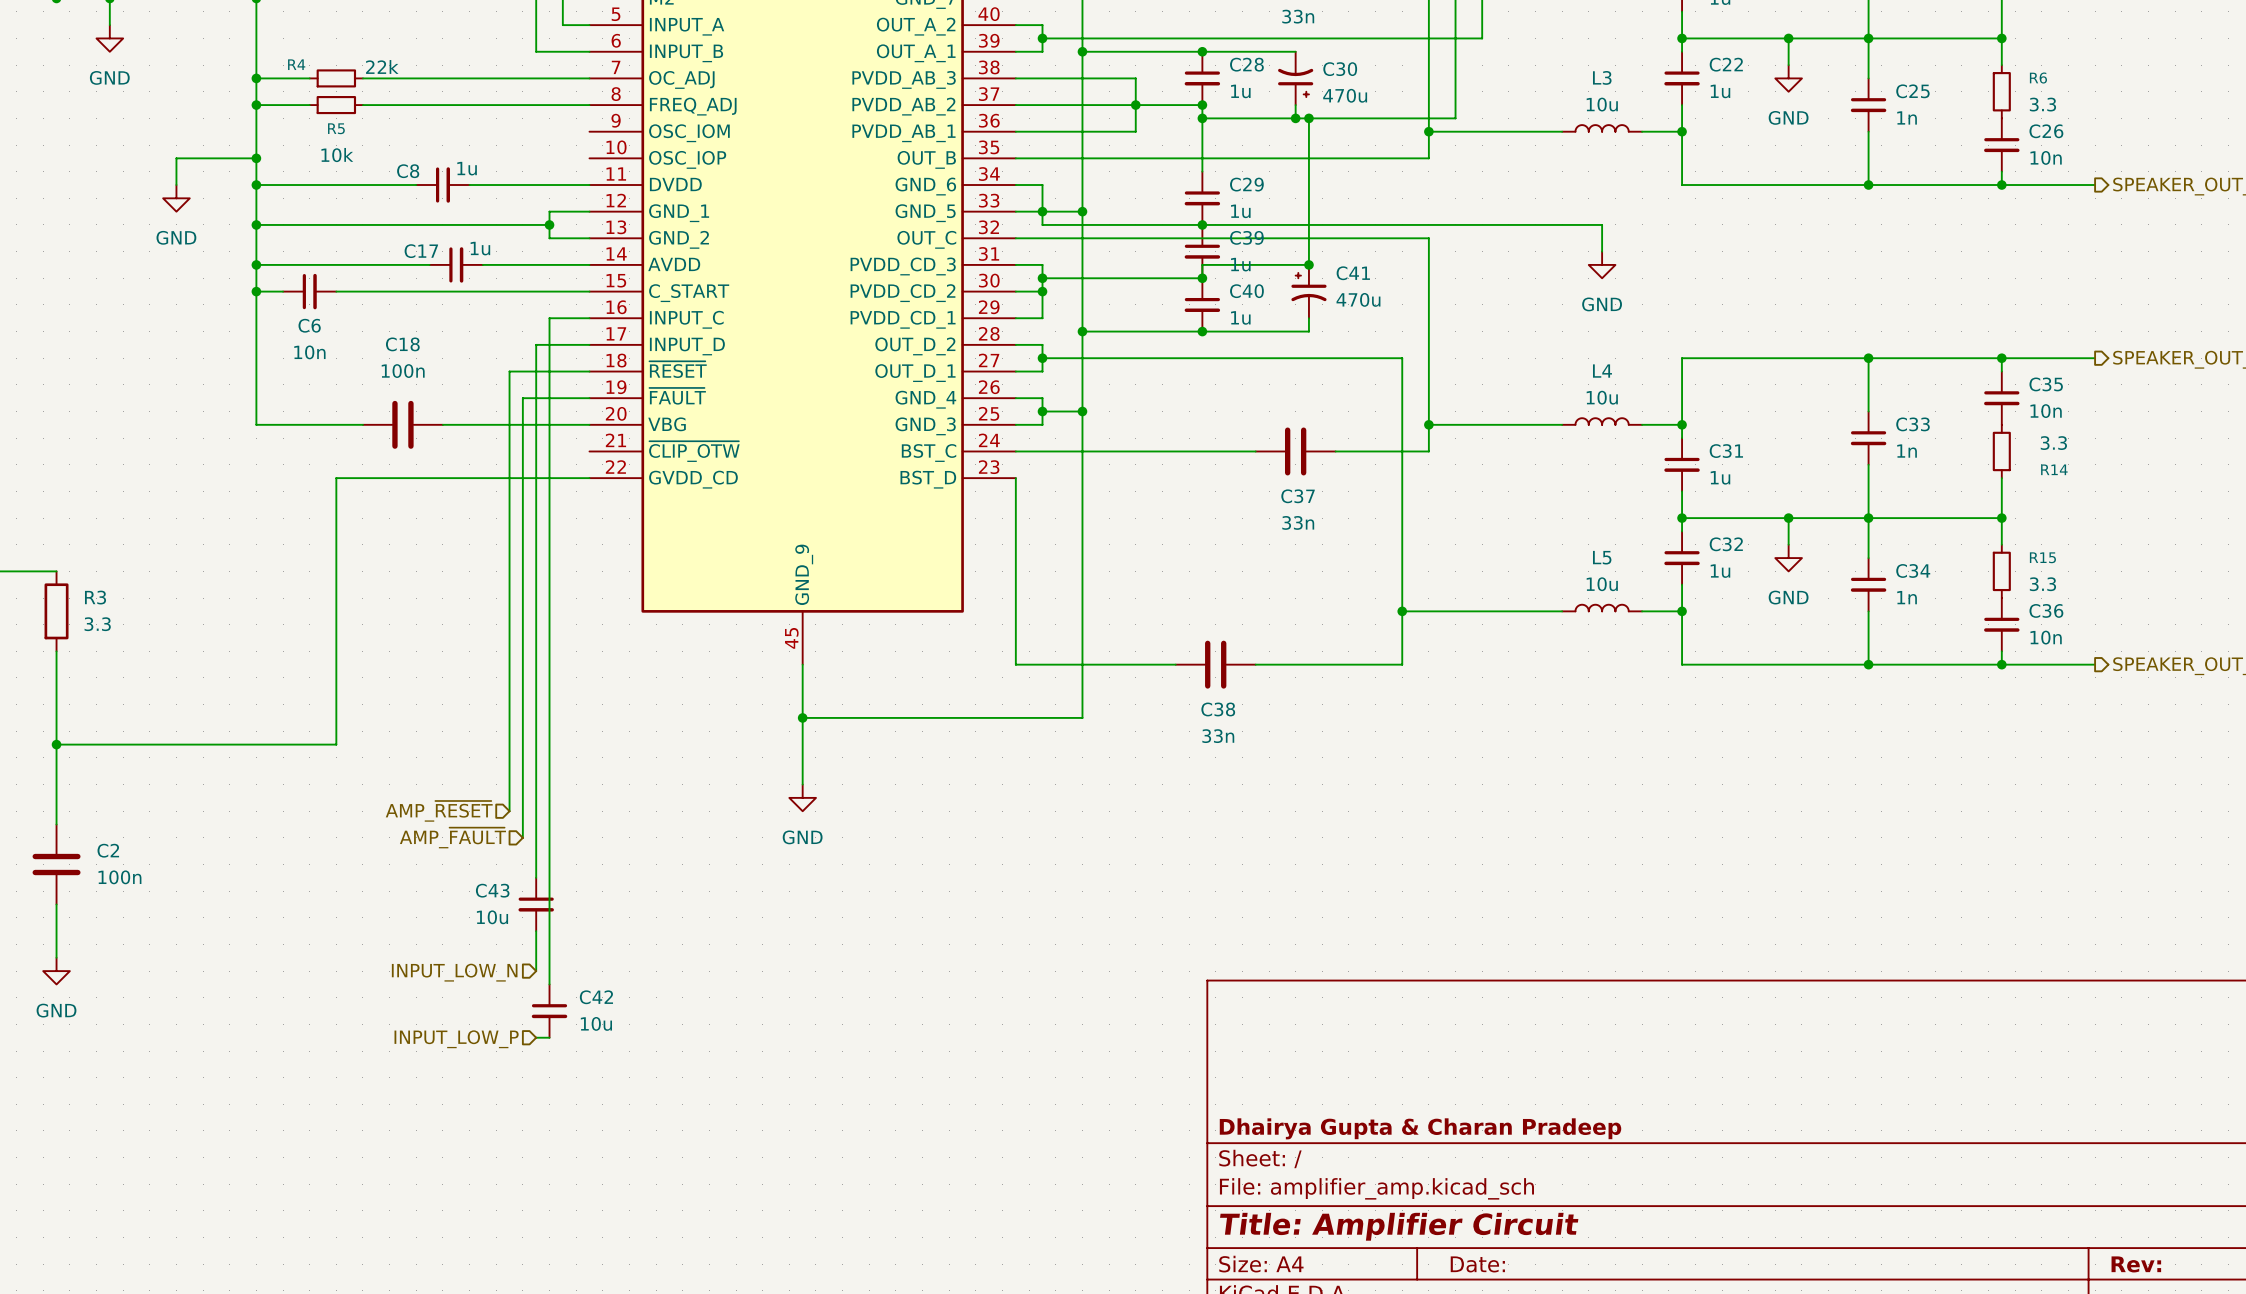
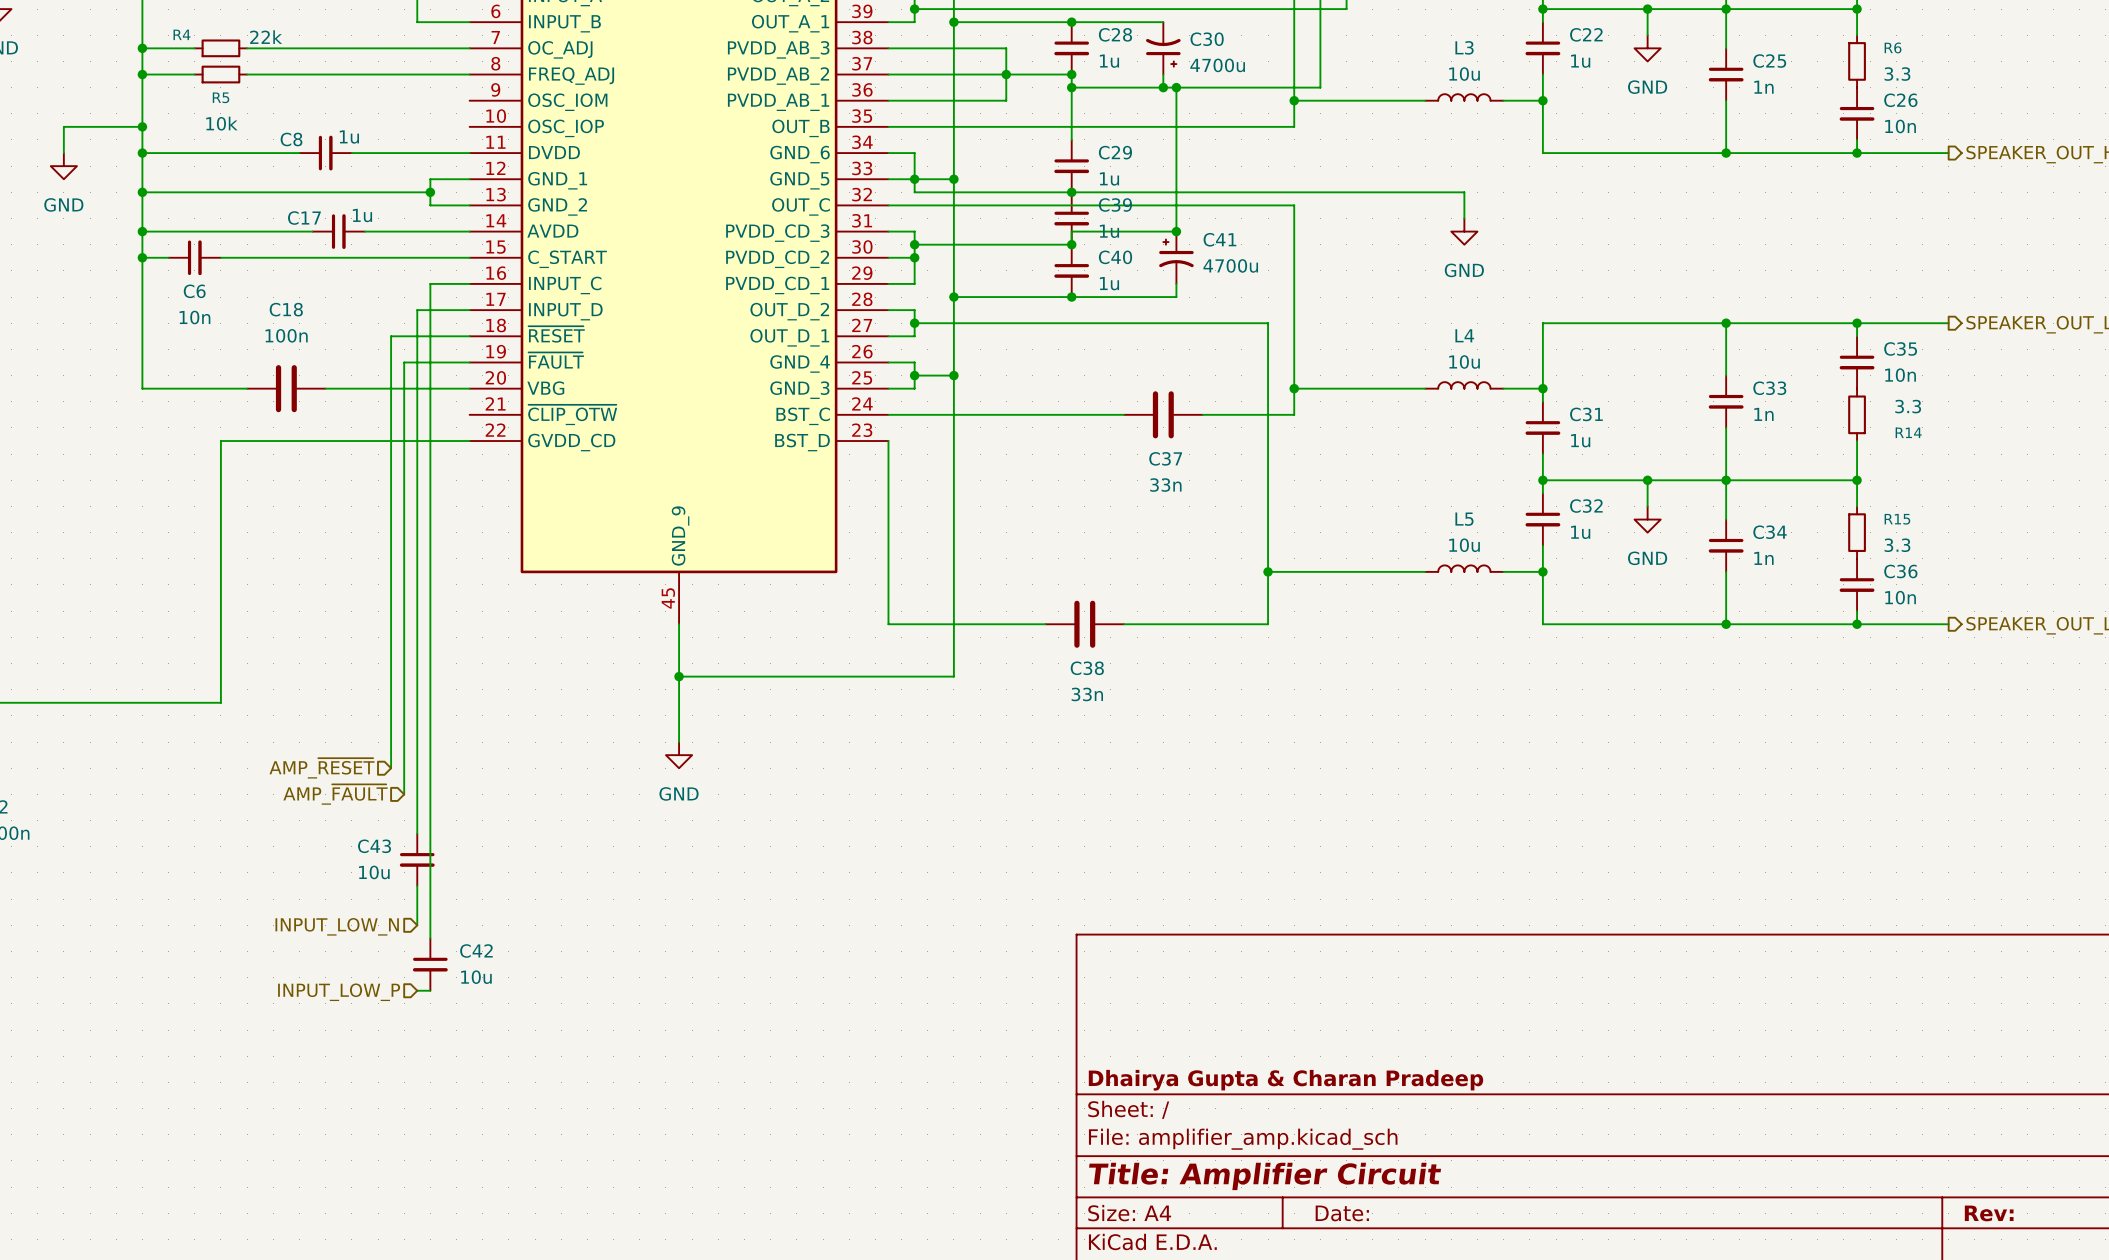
C30 value: 470u (1345, 95) -> 4700u (1217, 65)
C41 value: 470u (1358, 299) -> 4700u (1230, 265)

